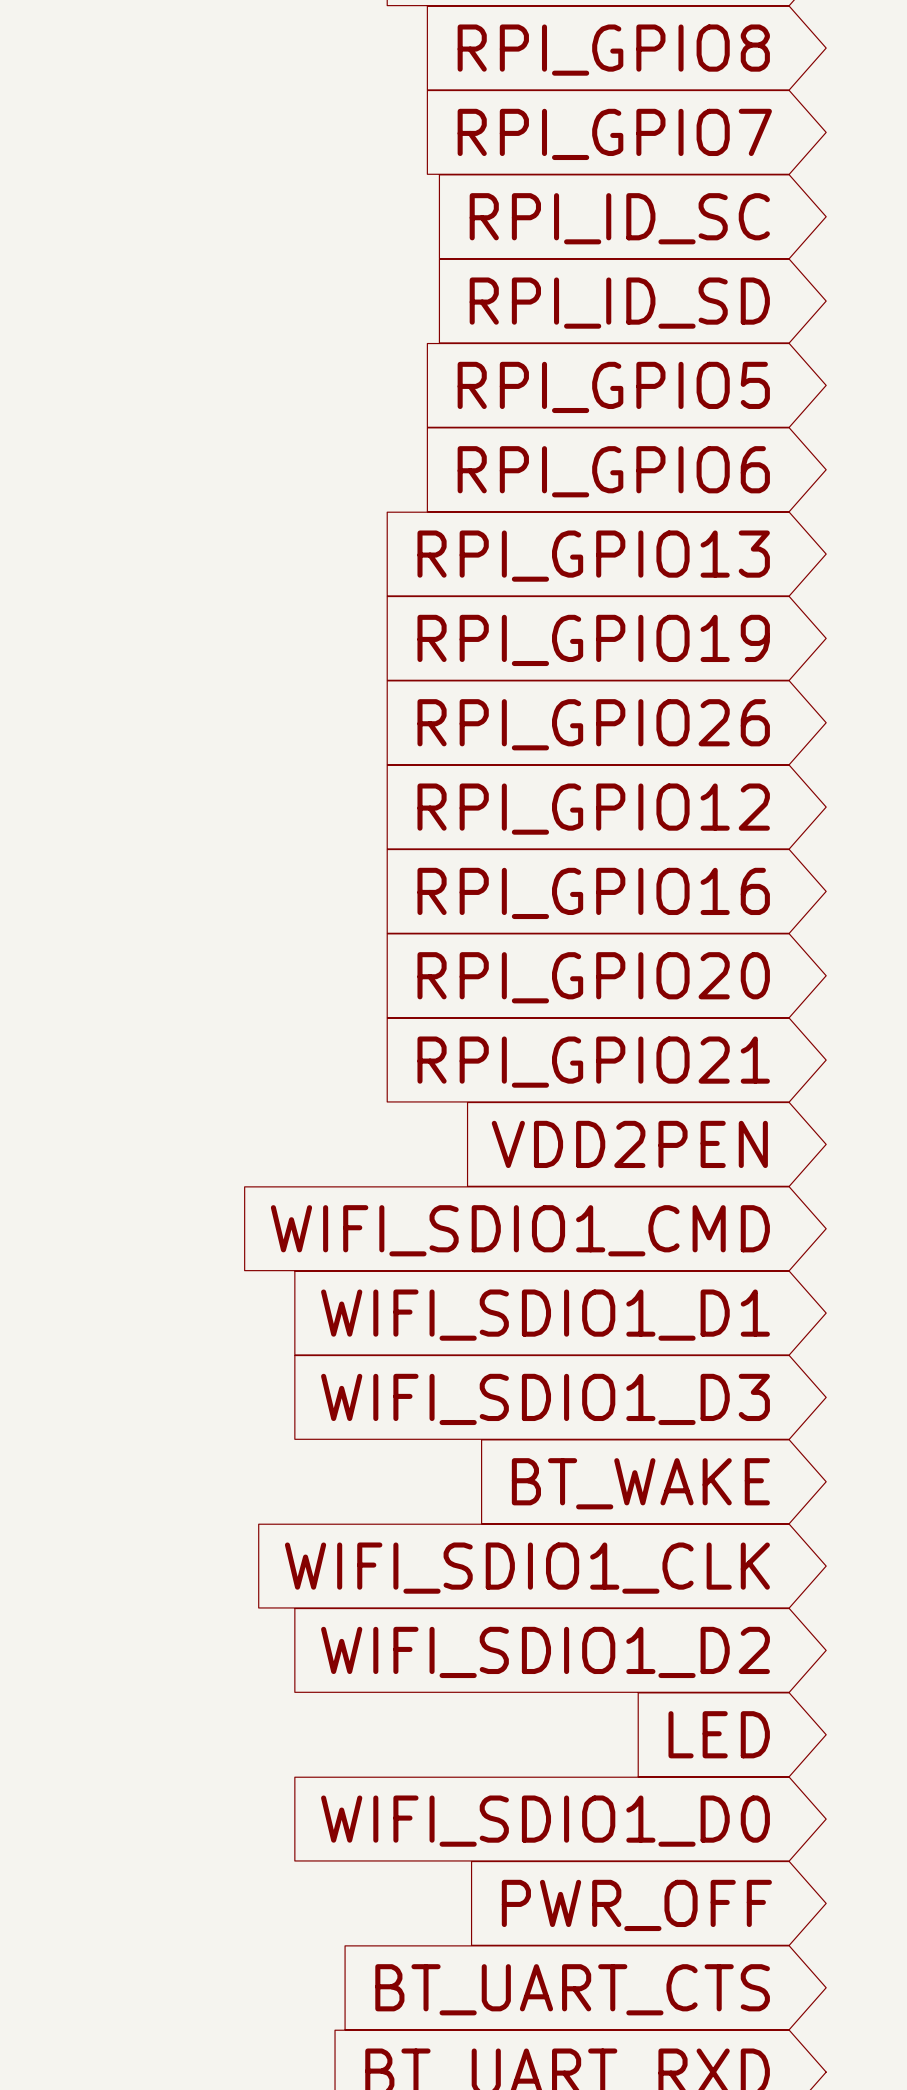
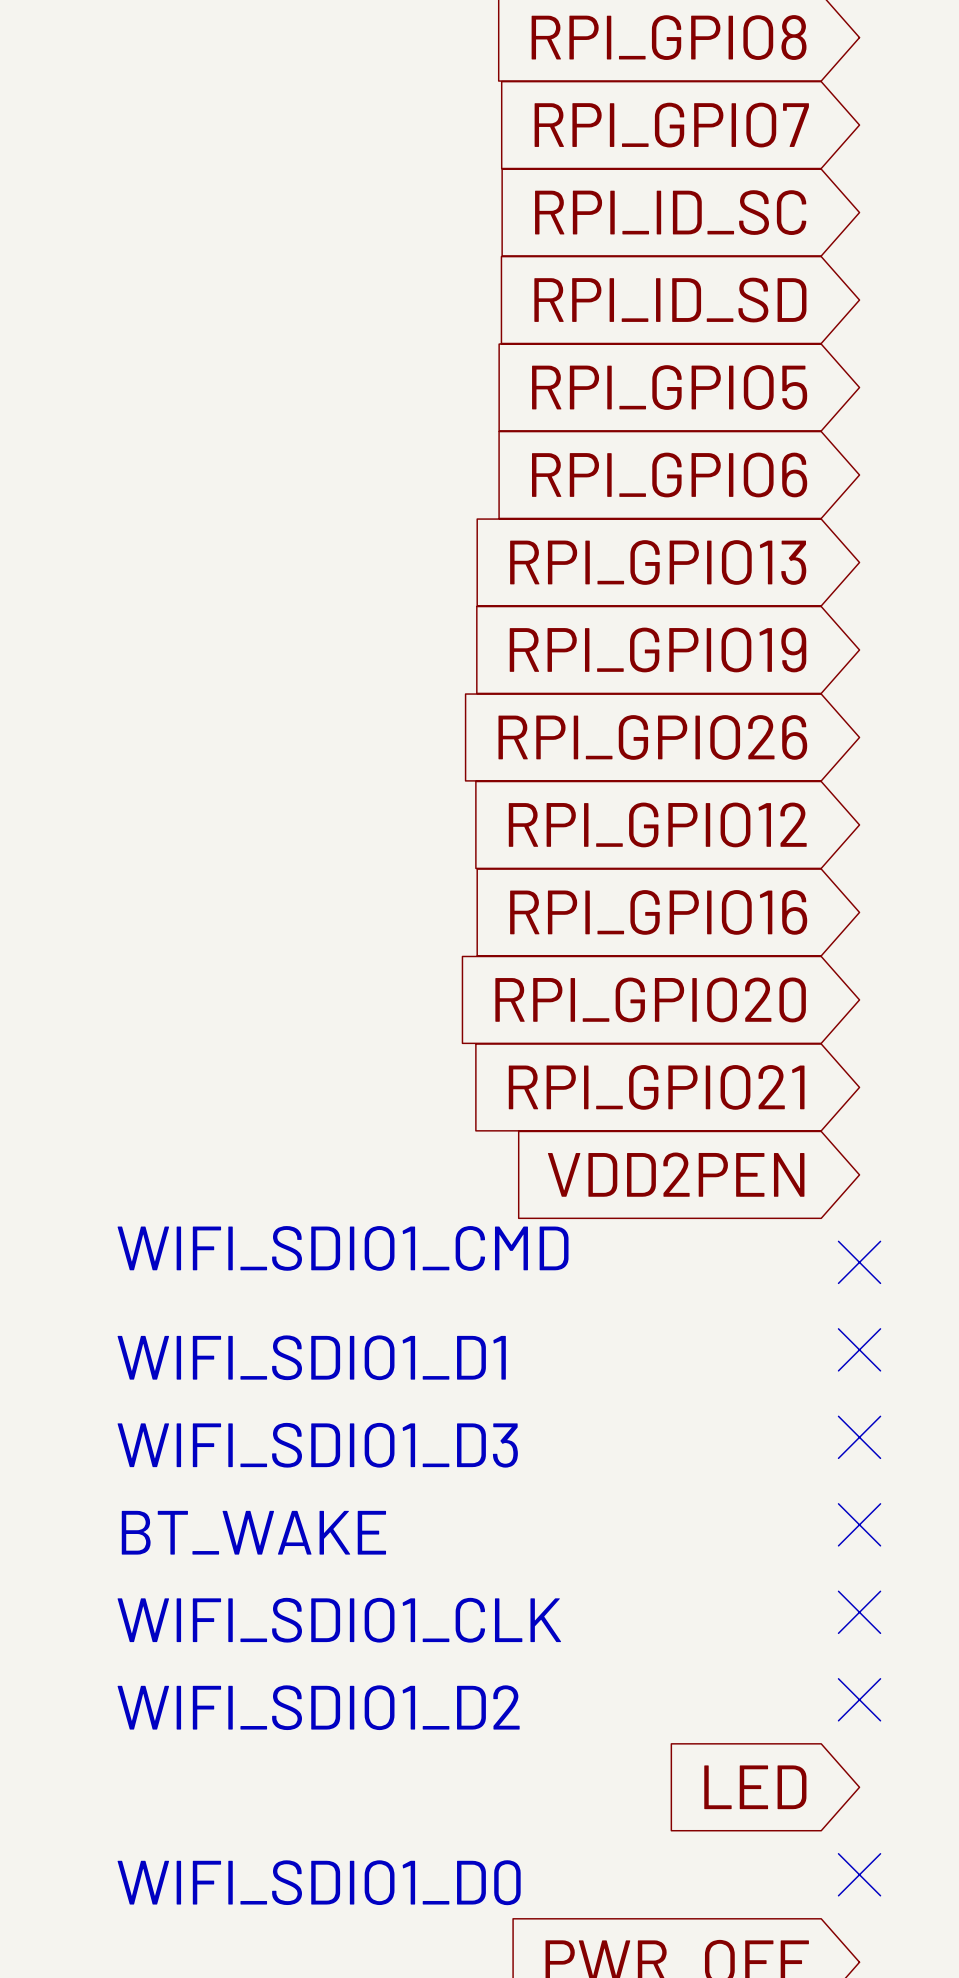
text: none -> WIFI_SDIO1_CMD (343, 1248)
no-connect mark: none -> (859, 1262)
global label: WIFI_SDIO1_CMD (520, 1230) -> none
no-connect mark: none -> (859, 1349)
global label: WIFI_SDIO1_D1 (545, 1315) -> none
text: none -> WIFI_SDIO1_D1 (311, 1357)
no-connect mark: none -> (859, 1437)
global label: WIFI_SDIO1_D3 (545, 1399) -> none
text: none -> WIFI_SDIO1_D3 (317, 1445)
no-connect mark: none -> (859, 1524)
global label: BT_WAKE (640, 1483) -> none
text: none -> BT_WAKE (253, 1532)
no-connect mark: none -> (859, 1612)
global label: WIFI_SDIO1_CLK (527, 1568) -> none
text: none -> WIFI_SDIO1_CLK (339, 1620)
no-connect mark: none -> (859, 1699)
global label: WIFI_SDIO1_D2 (545, 1652) -> none
text: none -> WIFI_SDIO1_D2 (318, 1707)
no-connect mark: none -> (859, 1874)
global label: WIFI_SDIO1_D0 (545, 1821) -> none
text: none -> WIFI_SDIO1_D0 (319, 1882)

